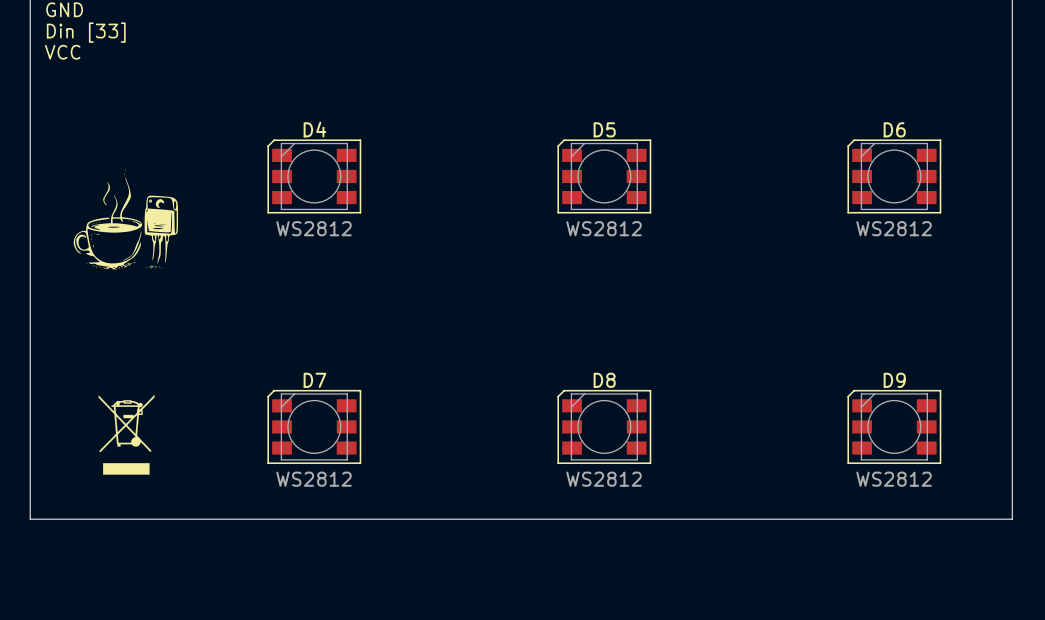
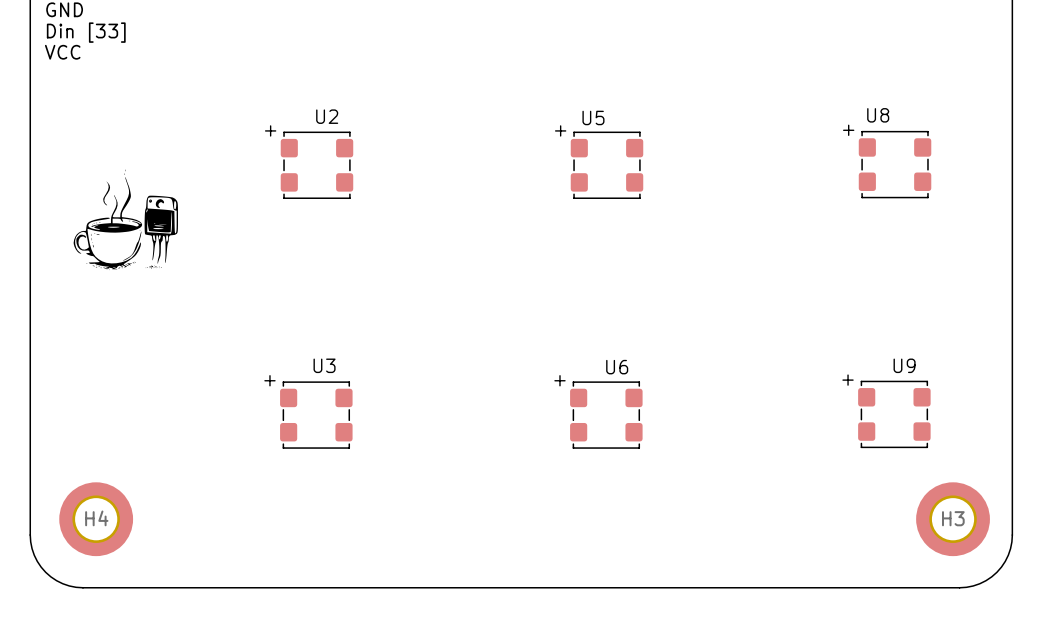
U8: none -> (895, 164)
U2: none -> (316, 165)
U5: none -> (606, 165)
D4: WS2812 (314, 176) -> none
D5: WS2812 (604, 176) -> none
D6: WS2812 (894, 176) -> none
drawing: [98, 394, 155, 475] -> none
U9: none -> (894, 414)
U3: none -> (316, 415)
U6: none -> (606, 415)
D7: WS2812 (314, 426) -> none
D8: WS2812 (604, 426) -> none
D9: WS2812 (894, 426) -> none
board edge: (30, 519) (1012, 519) -> (30, 519) (32, 548) (41, 567) (56, 580) (69, 585) (82, 587) (966, 587) (985, 580) (1001, 567) (1010, 548) (1012, 519)
H4: none -> (96, 519)
H3: none -> (953, 519)

